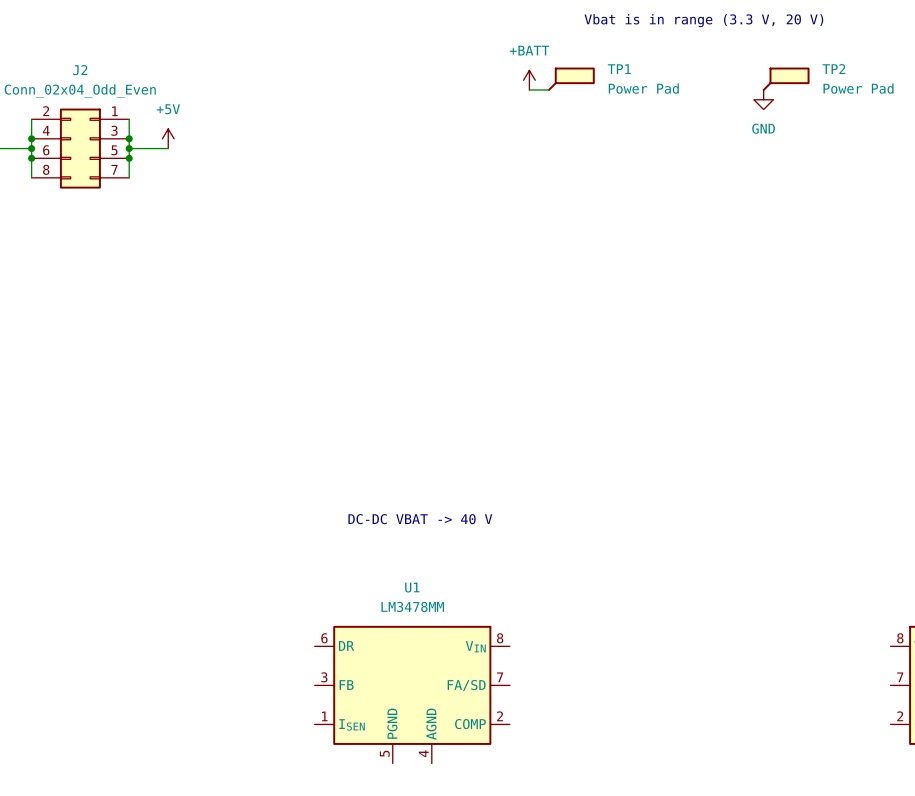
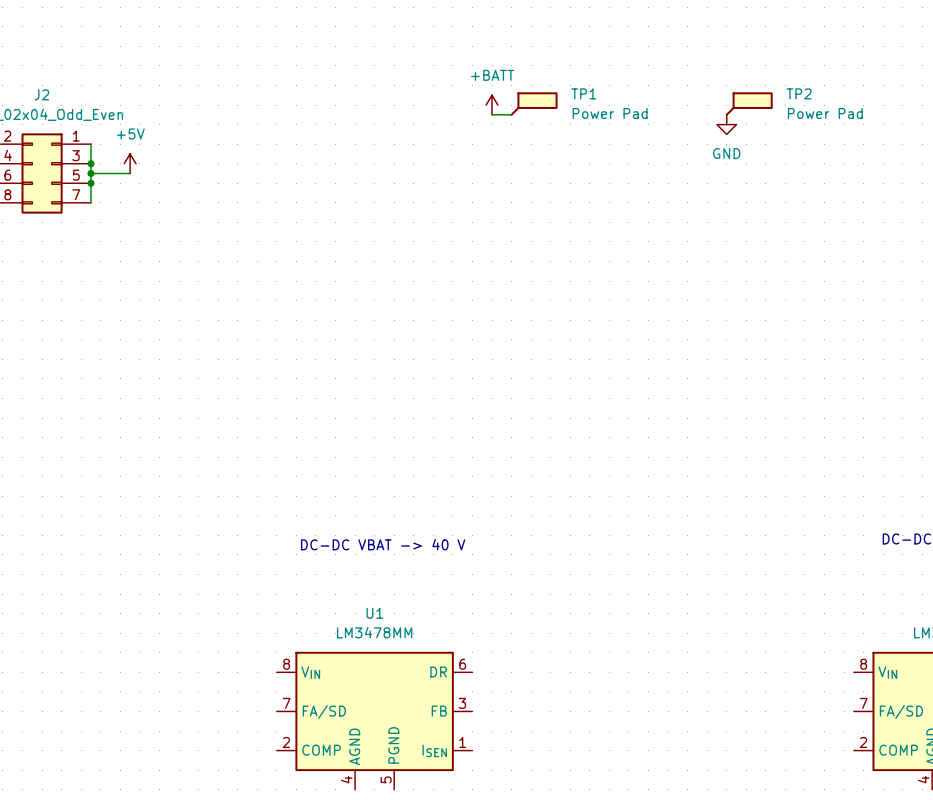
text: Vbat is in range (3.3 V, 20 V) (703, 20) -> none
U1 flip: as is (412, 685) -> left-right (374, 711)

